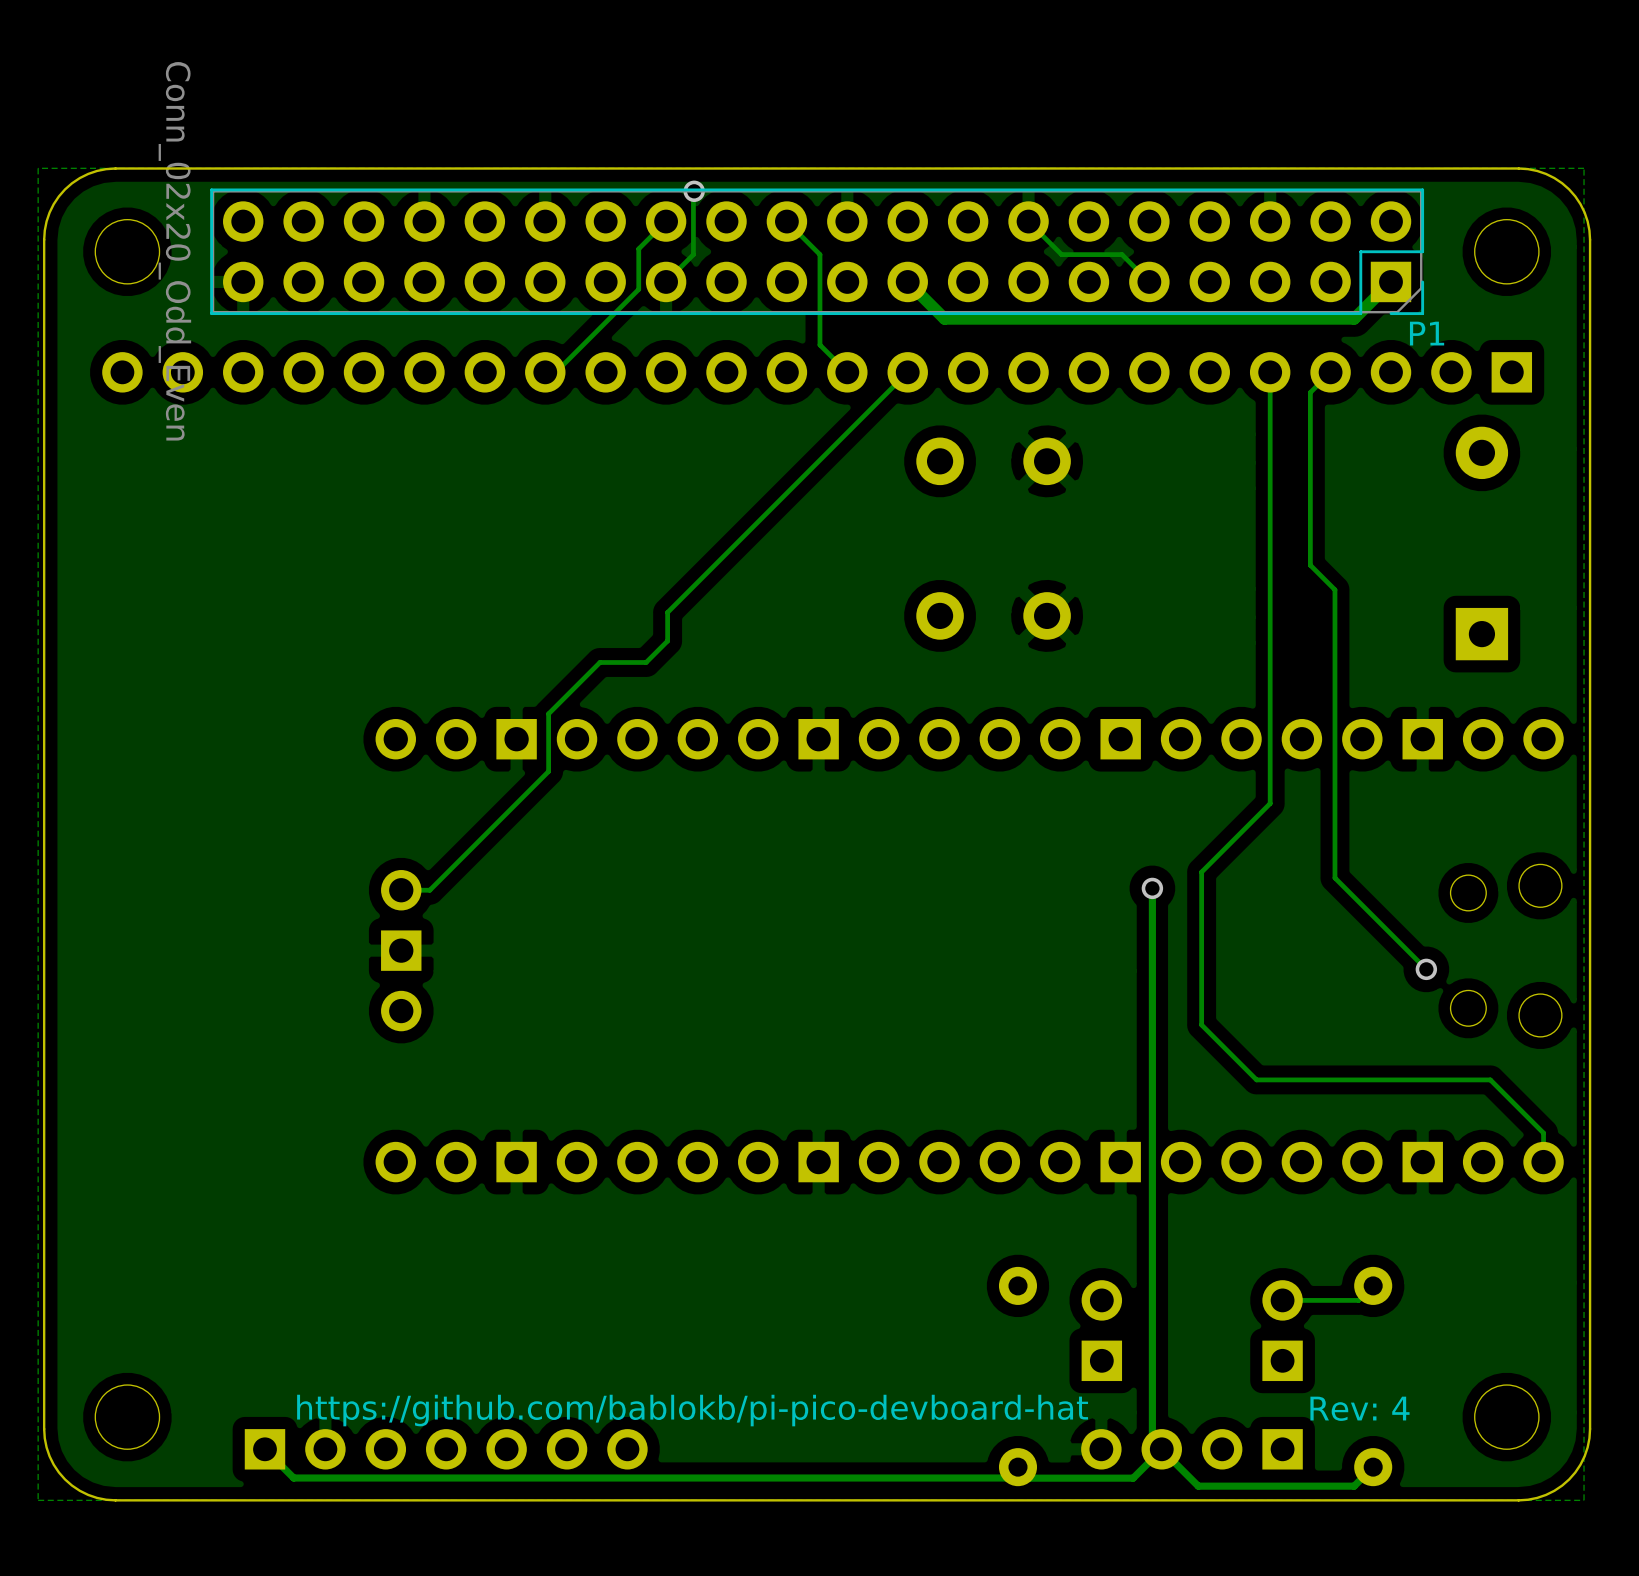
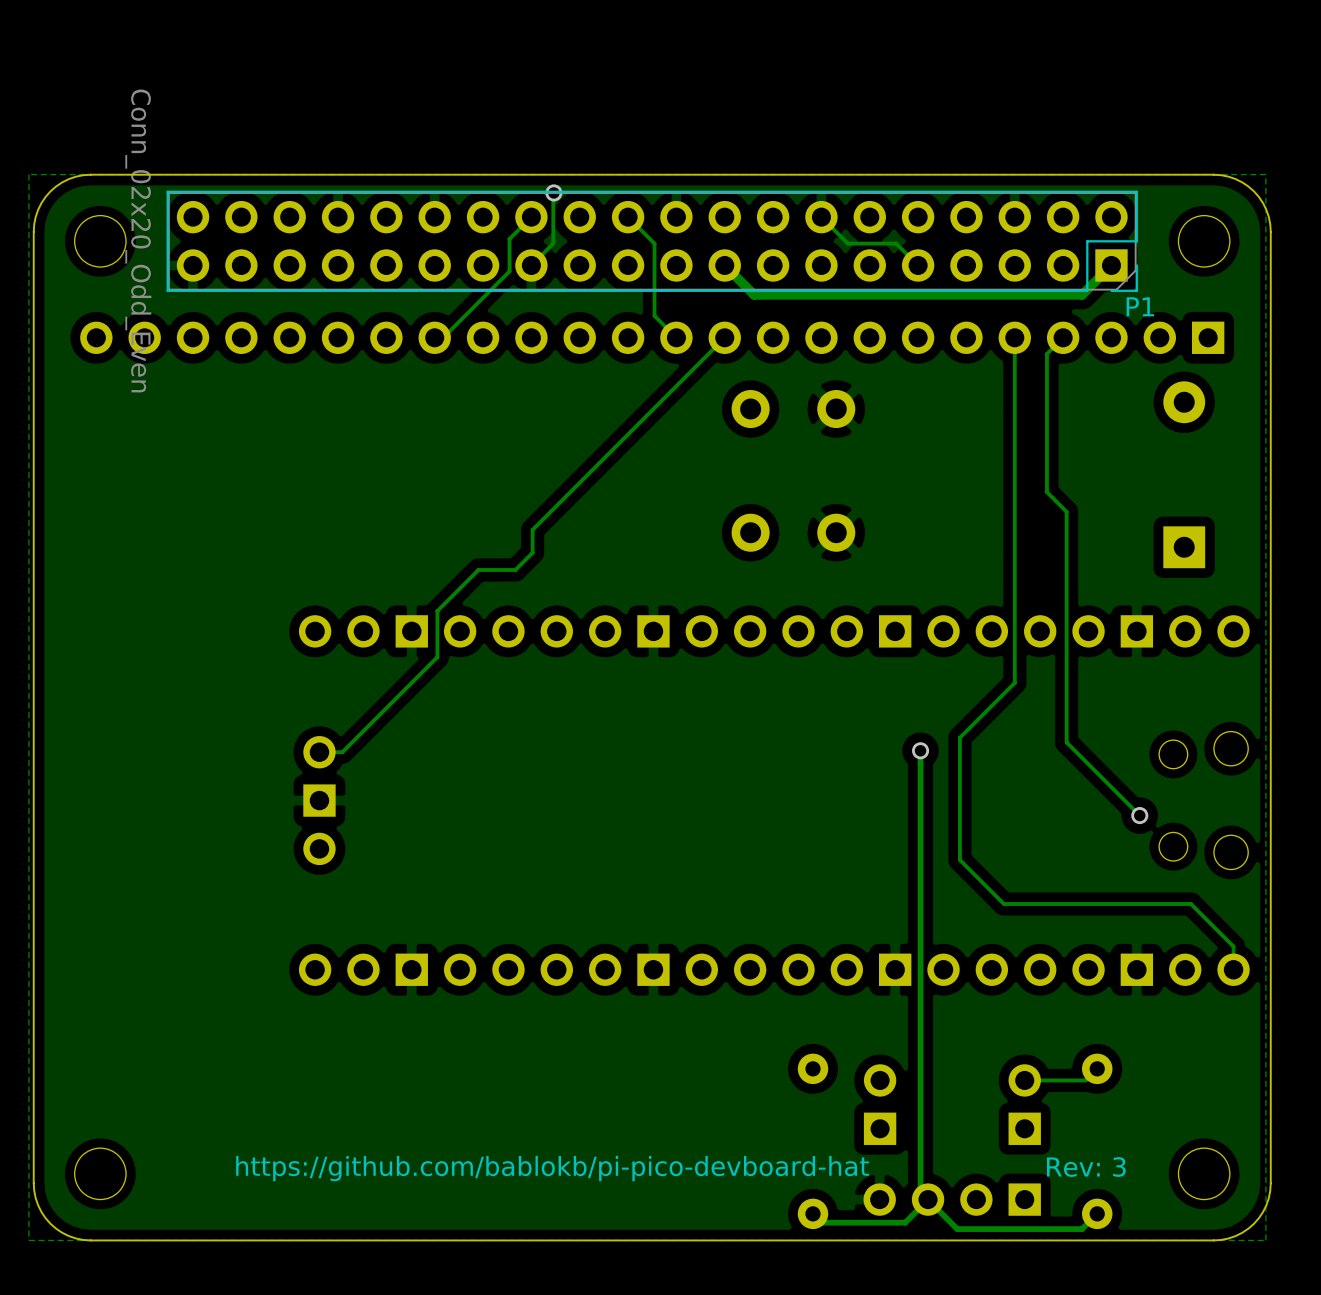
text: Rev: 4 (1359, 1408) -> Rev: 3 (1086, 1167)
track: (264, 1449) (293, 1478) (1007, 1478) (1017, 1467) -> none
part: (446, 1449) -> none

